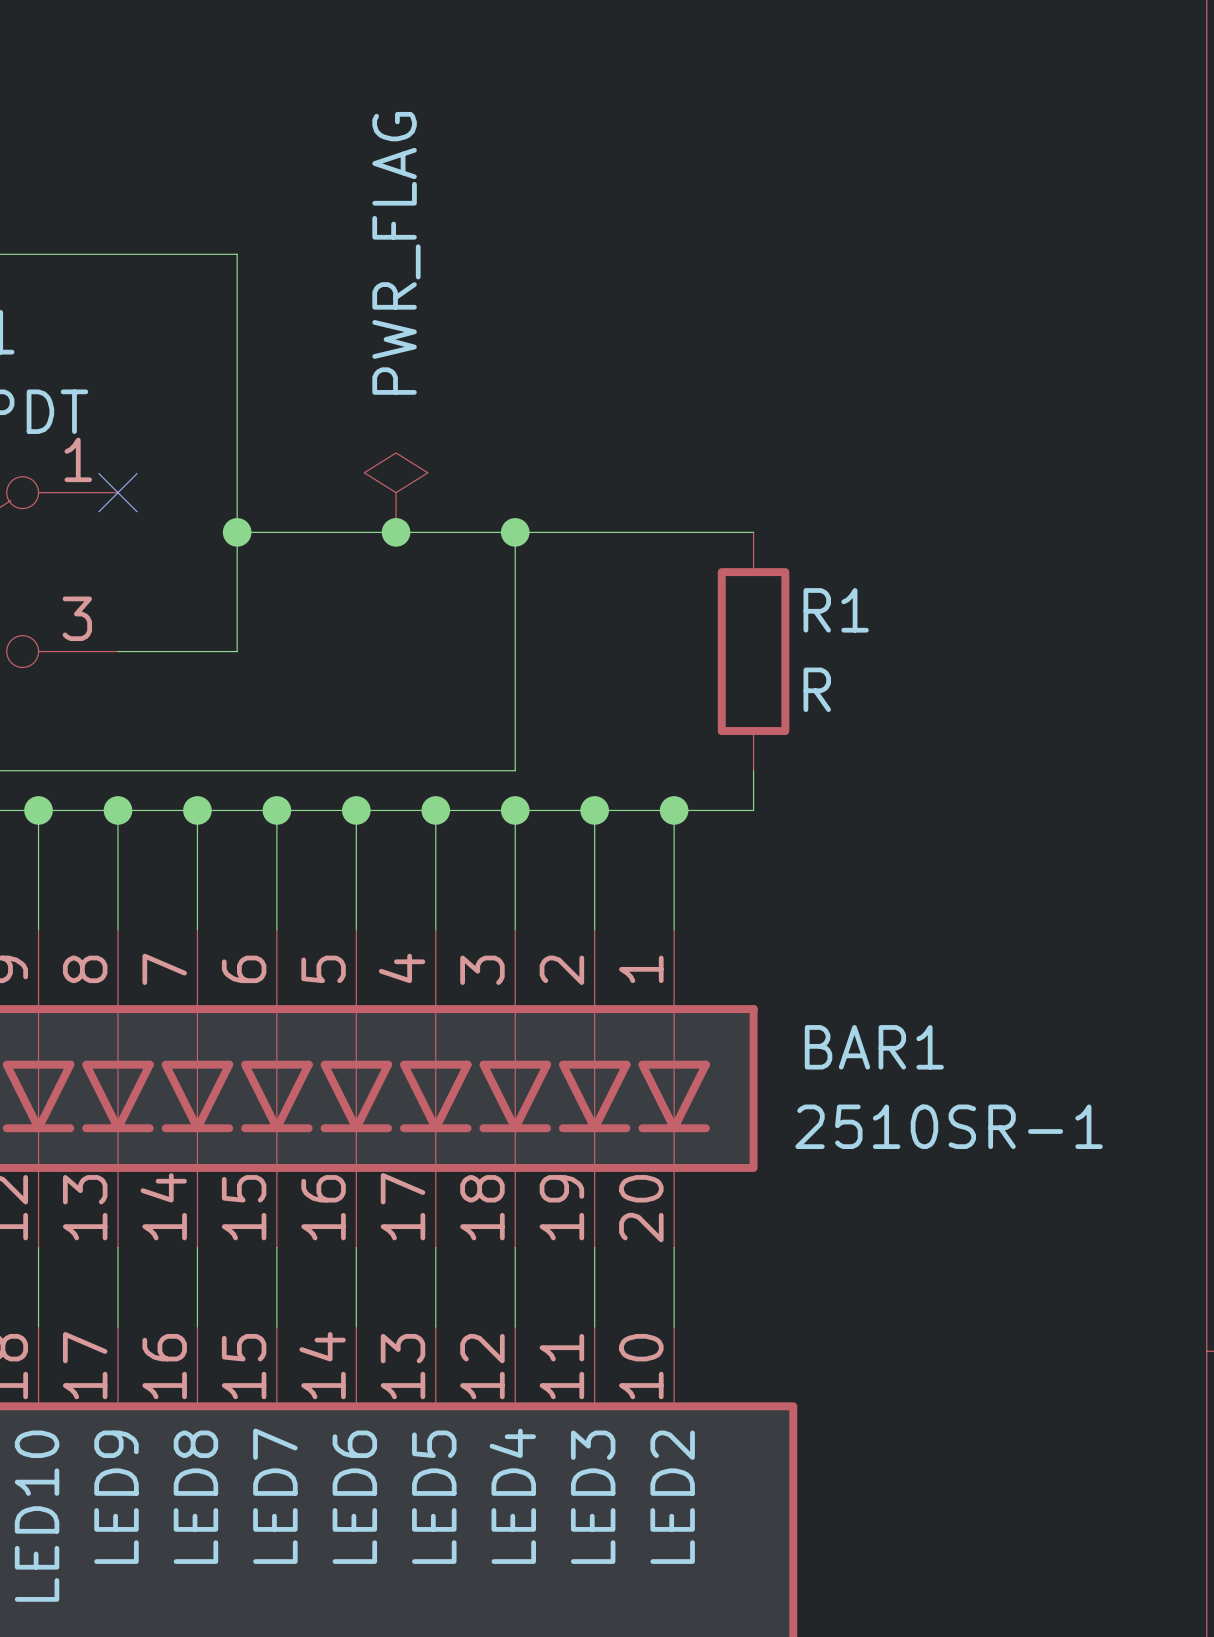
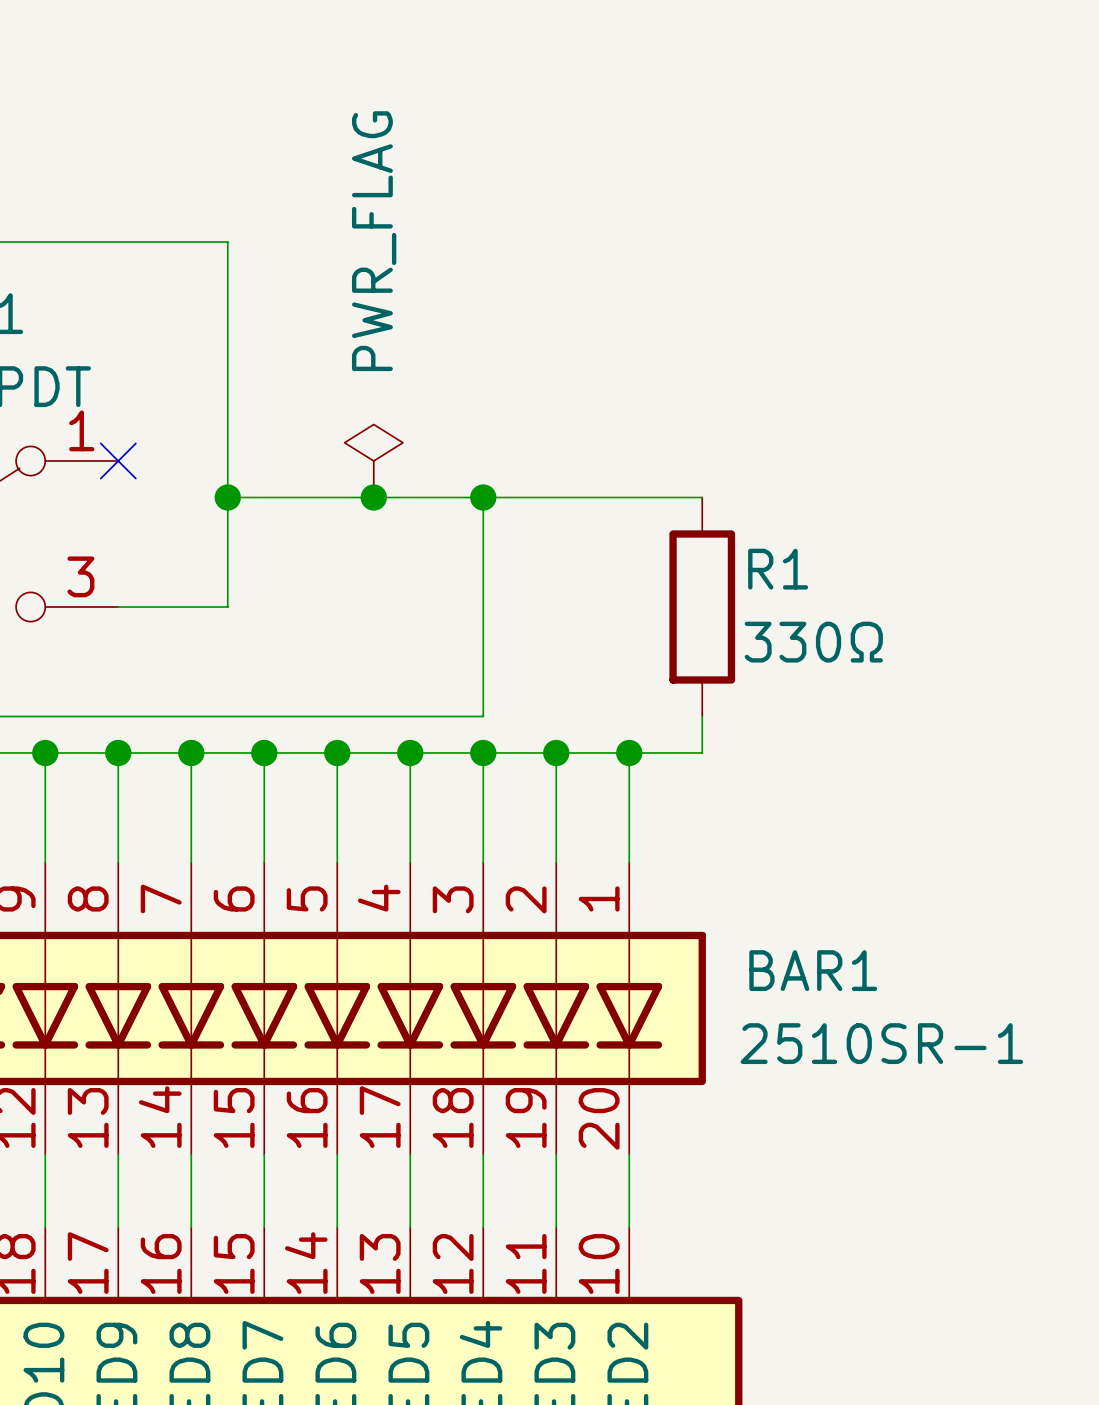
R1 value: R (817, 689) -> 330Ω (813, 642)

